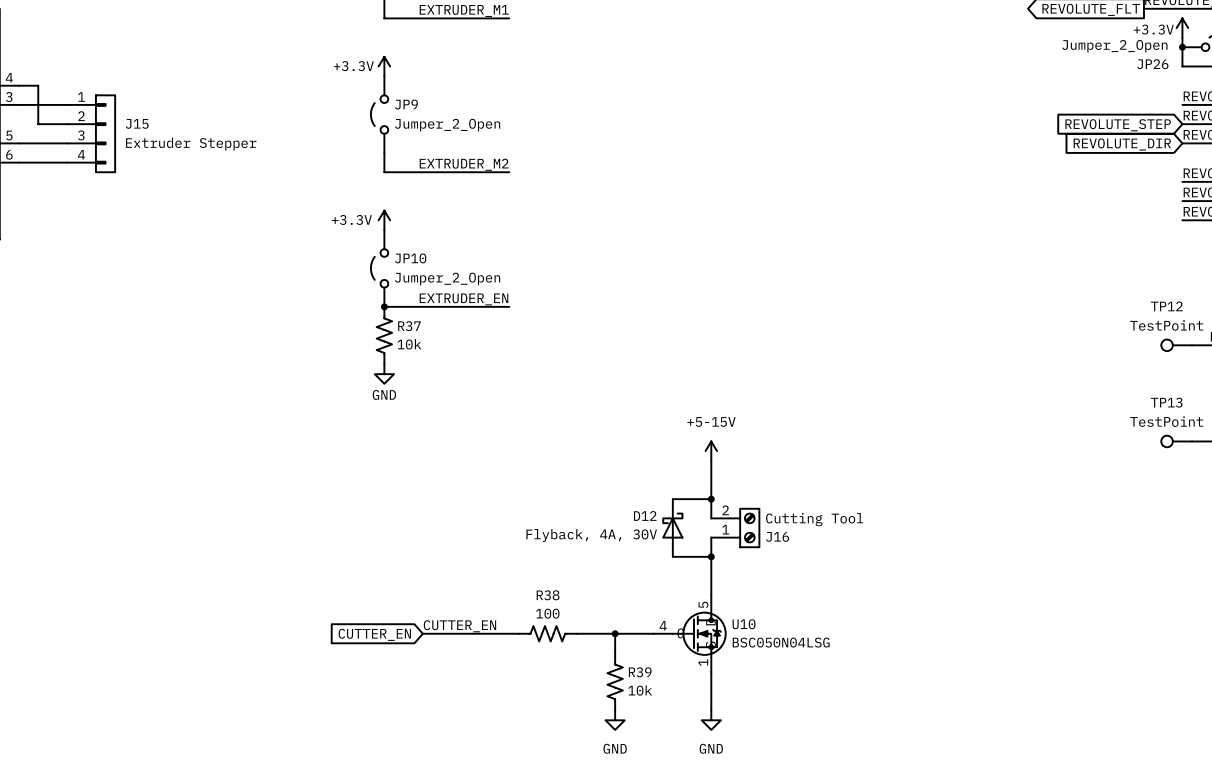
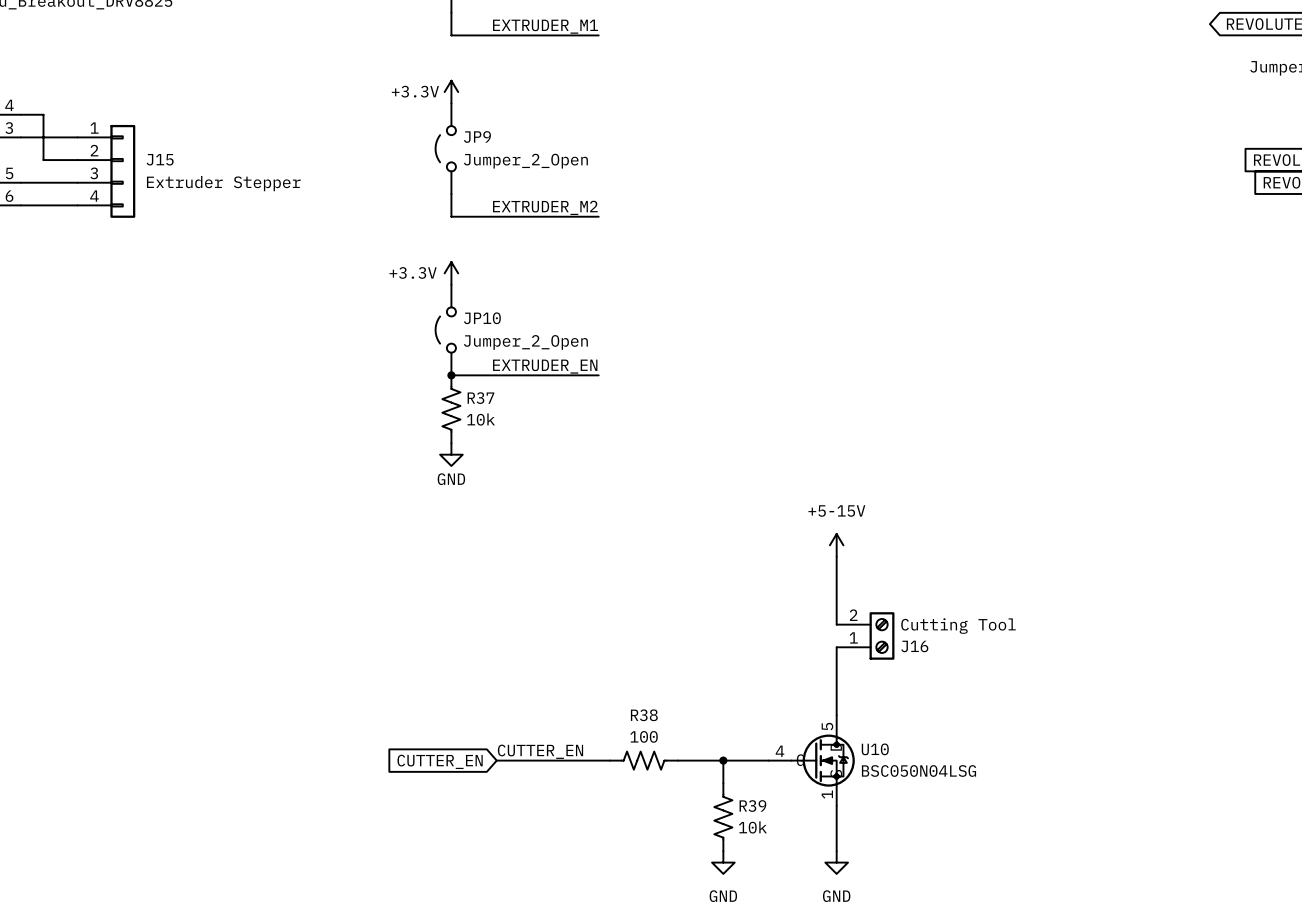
wire: (672, 499) (711, 499) -> none
junction: (711, 499) -> none
D12: Flyback, 4A, 30V (672, 528) -> none
wire: (672, 556) (711, 556) -> none
junction: (711, 556) -> none

